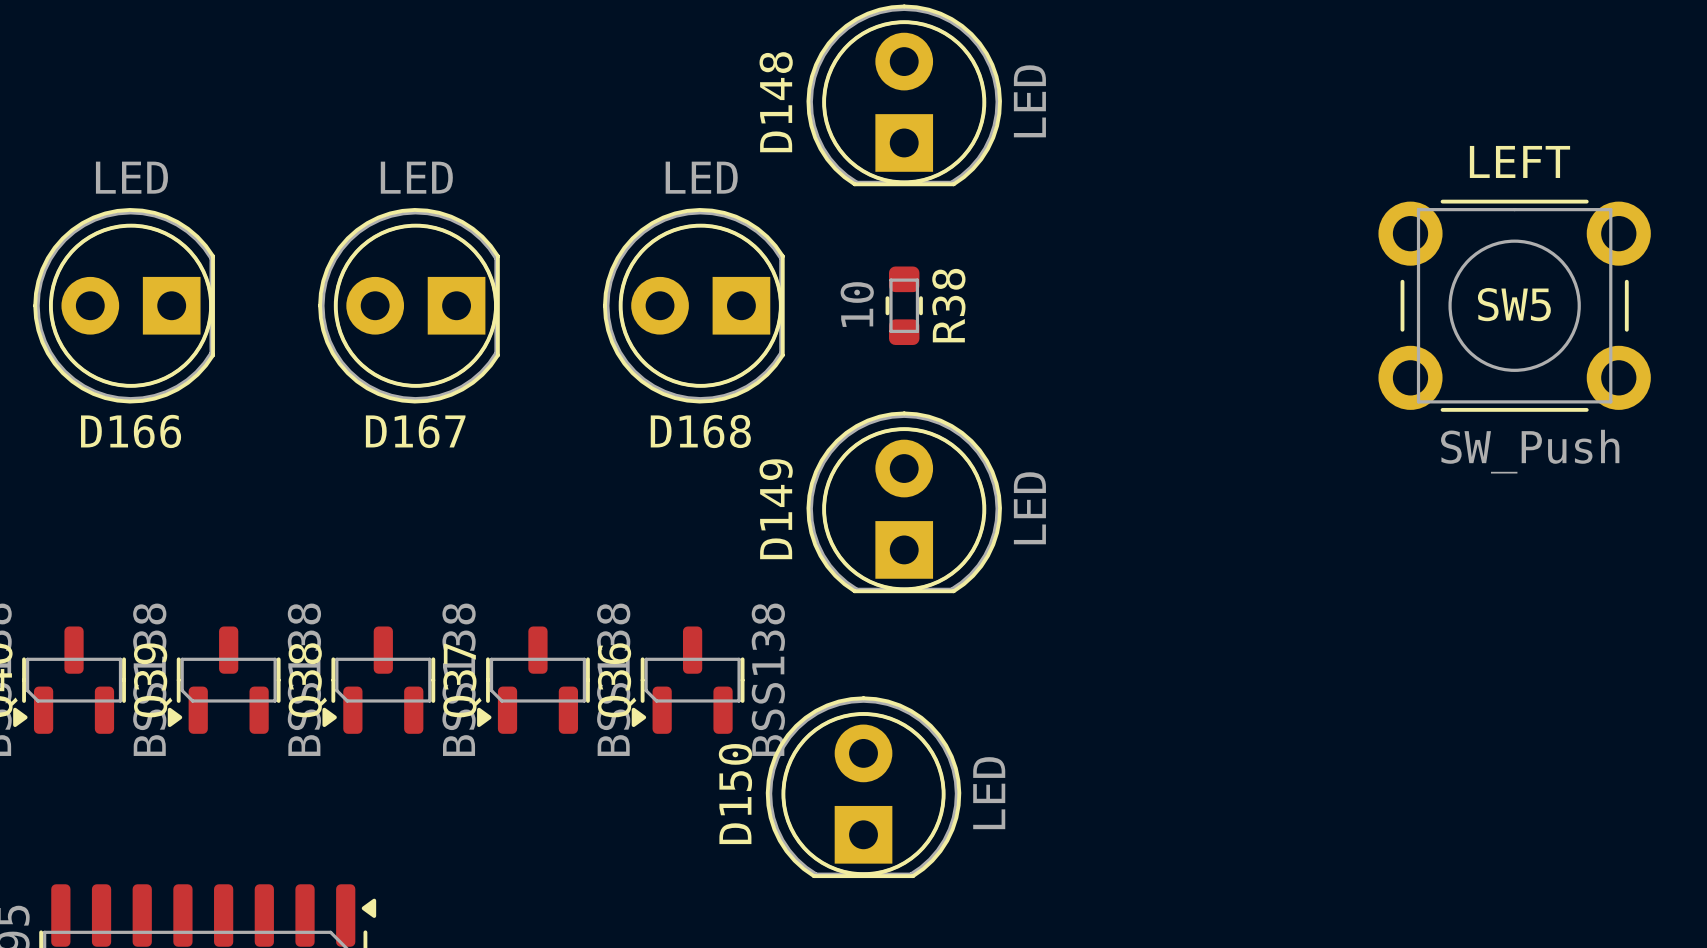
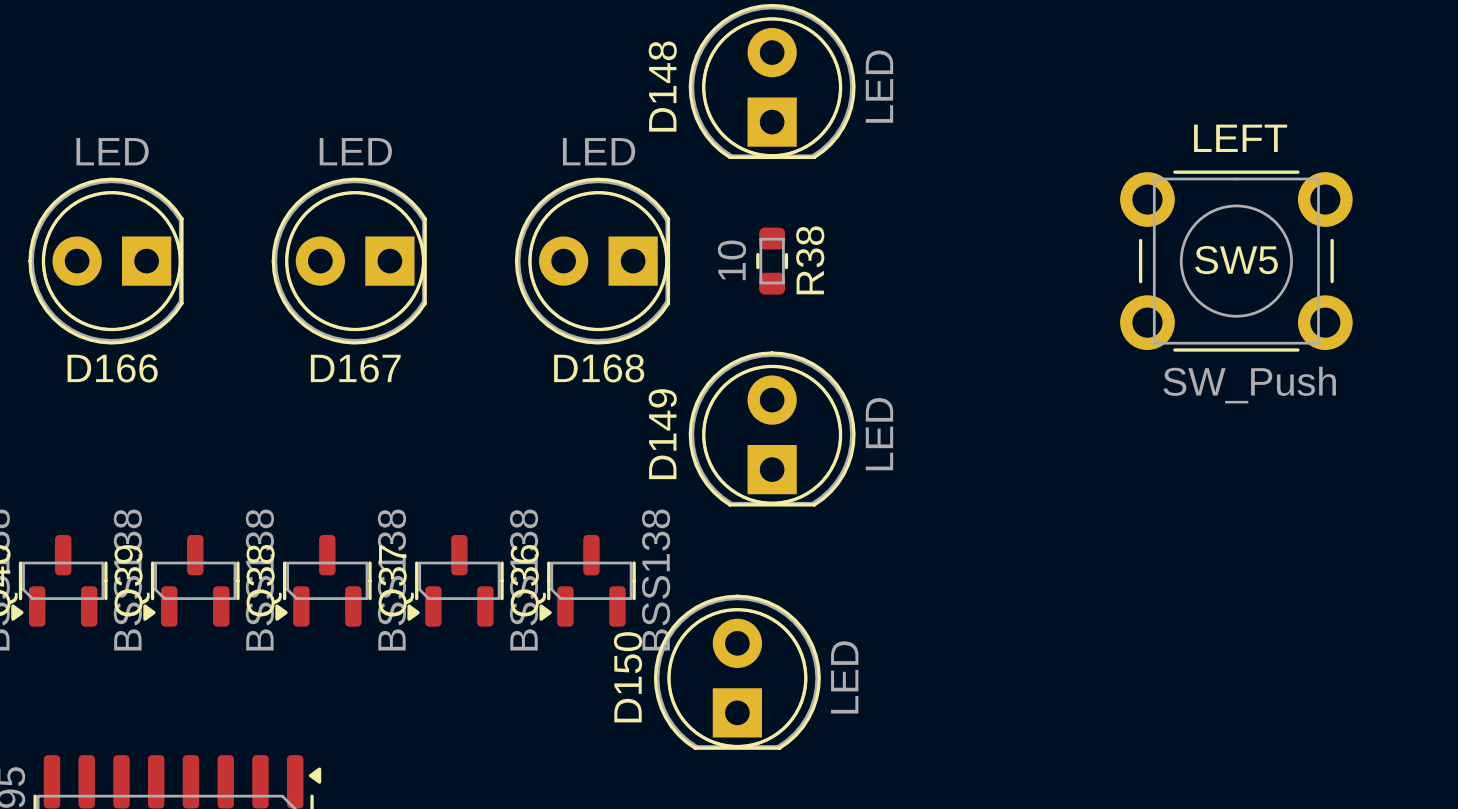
text position: LEFT (1519, 161) -> LEFT (1240, 138)
SW5 position: (1514, 305) -> (1236, 261)

